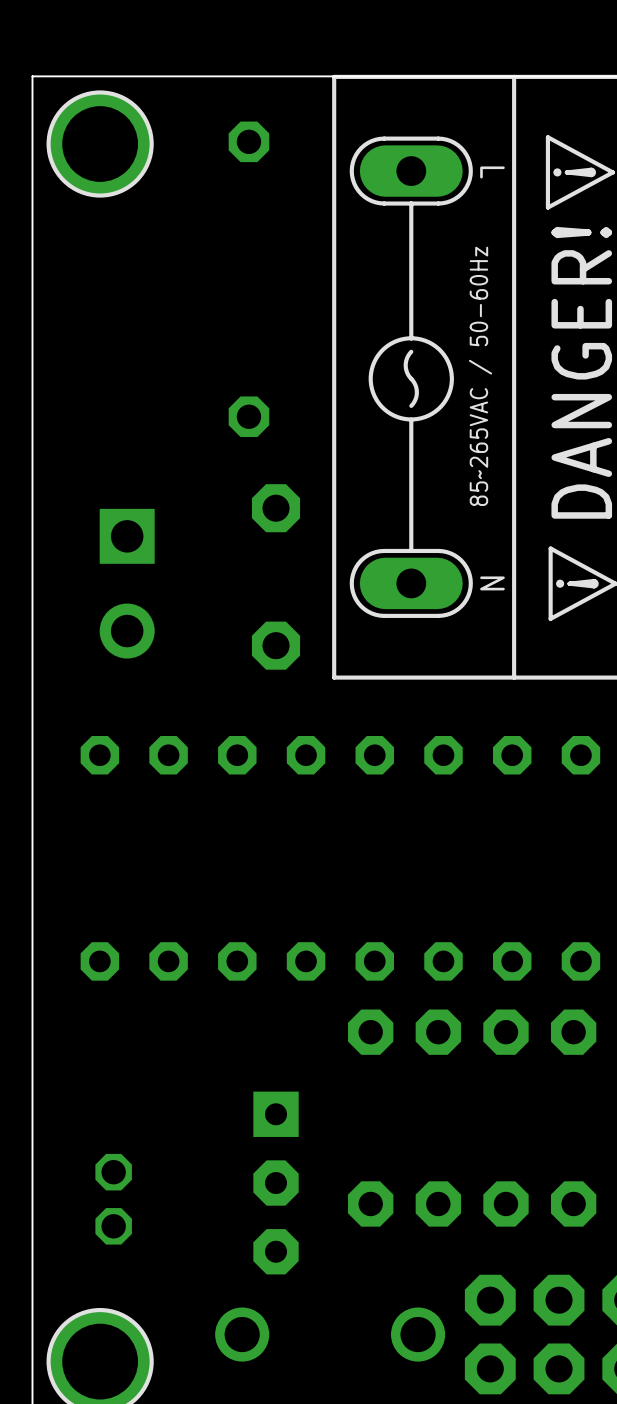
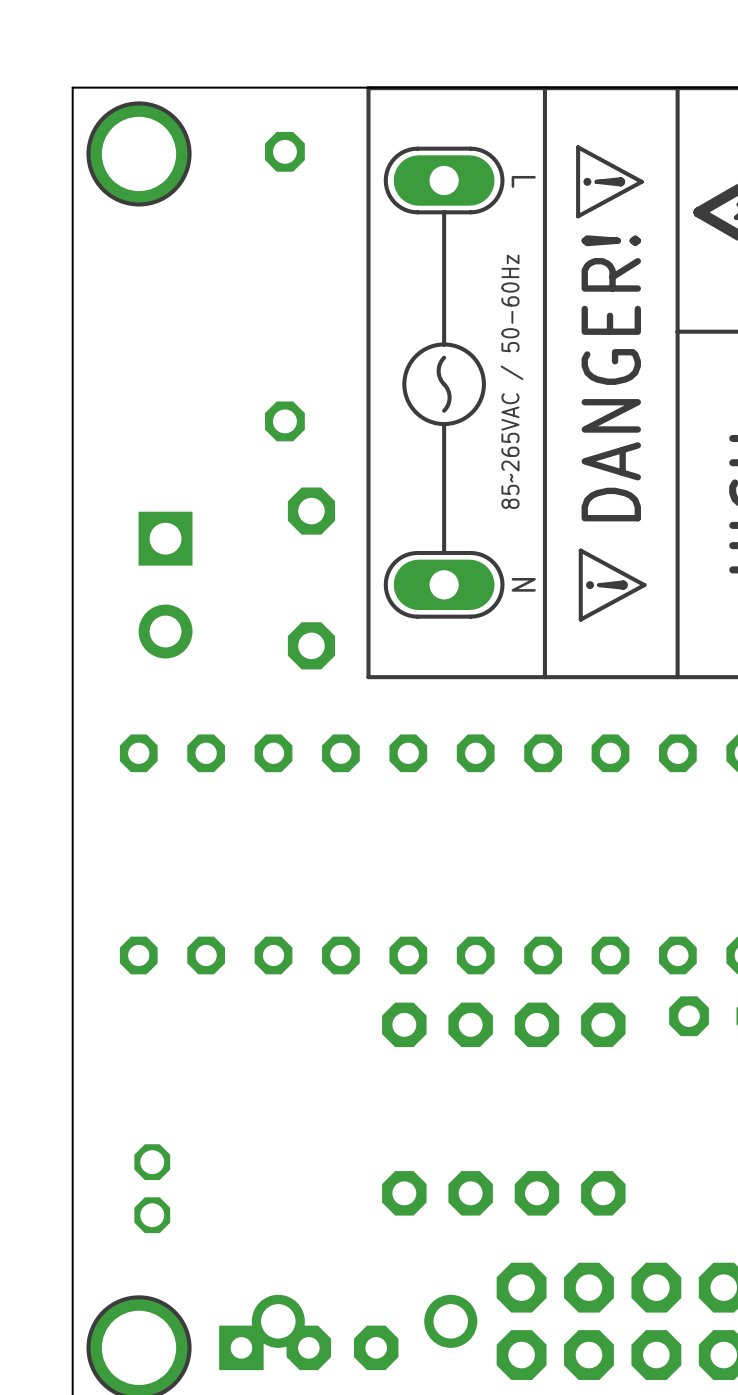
part rotation: 0° (276, 1183) -> 90° counterclockwise (308, 1347)
part position: (276, 1183) -> (308, 1347)

